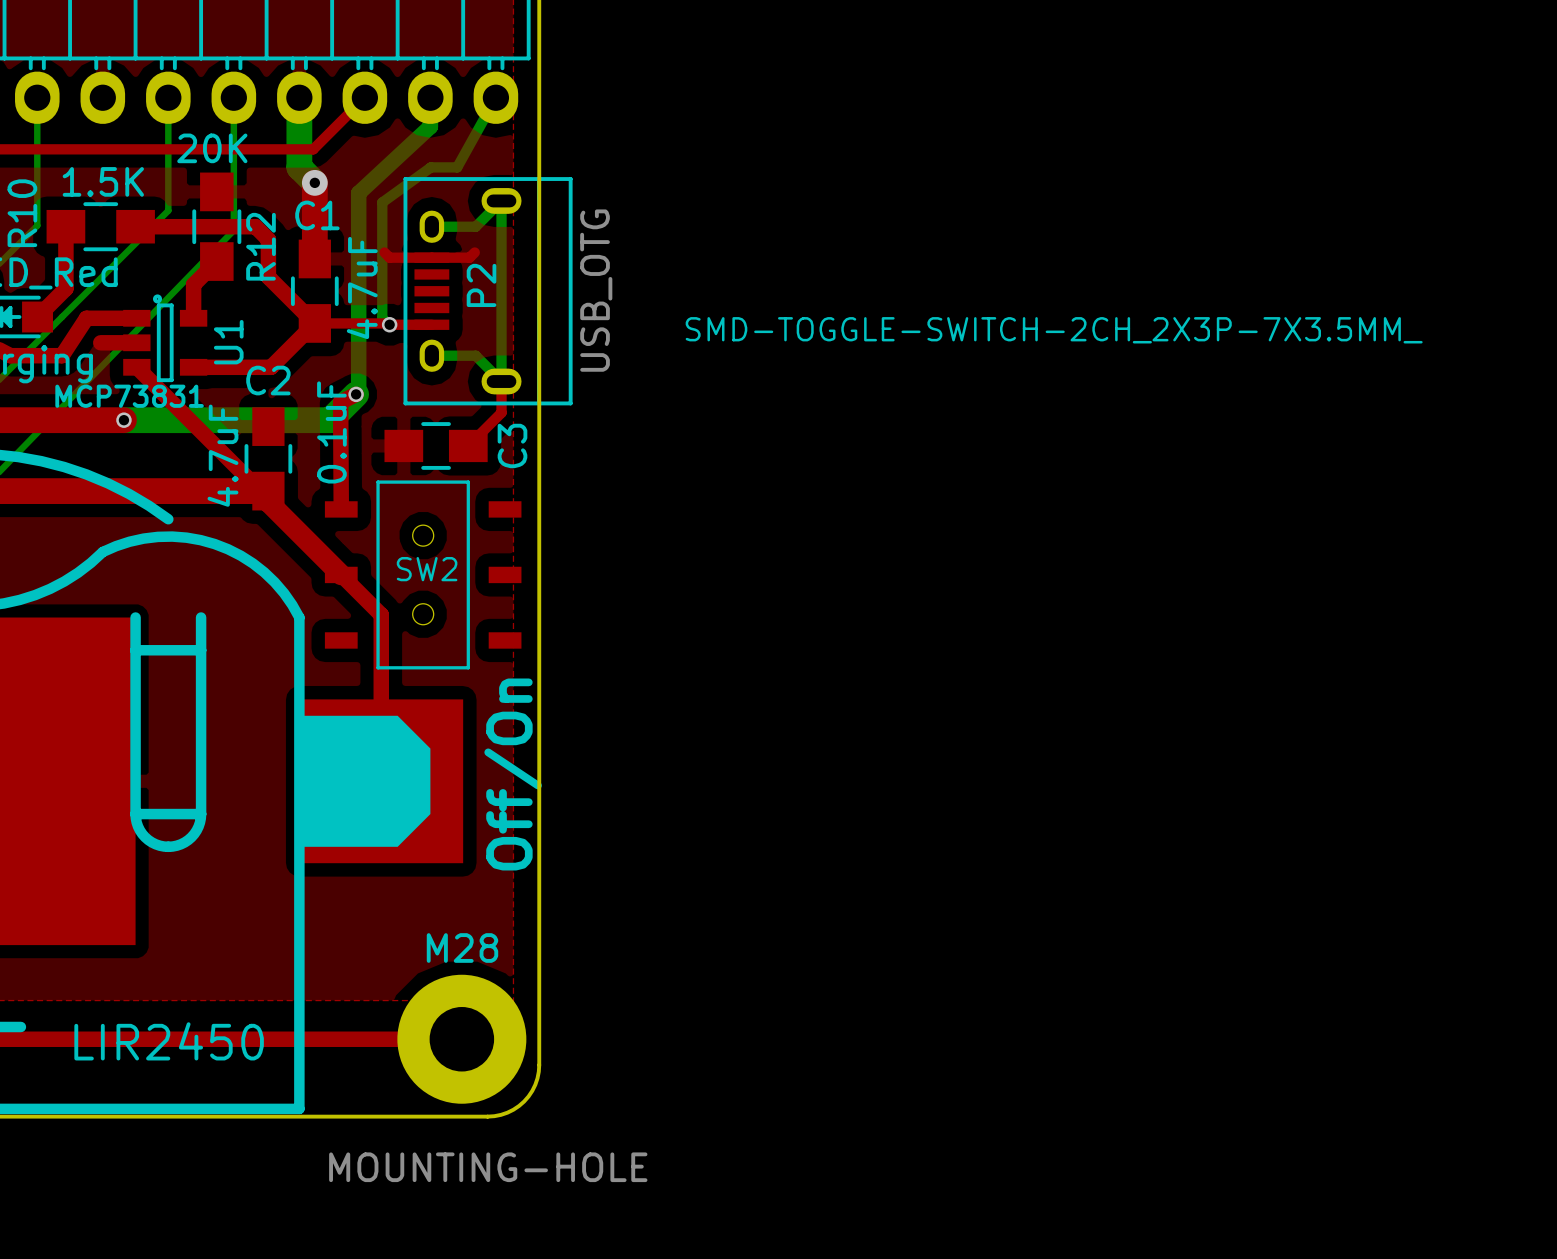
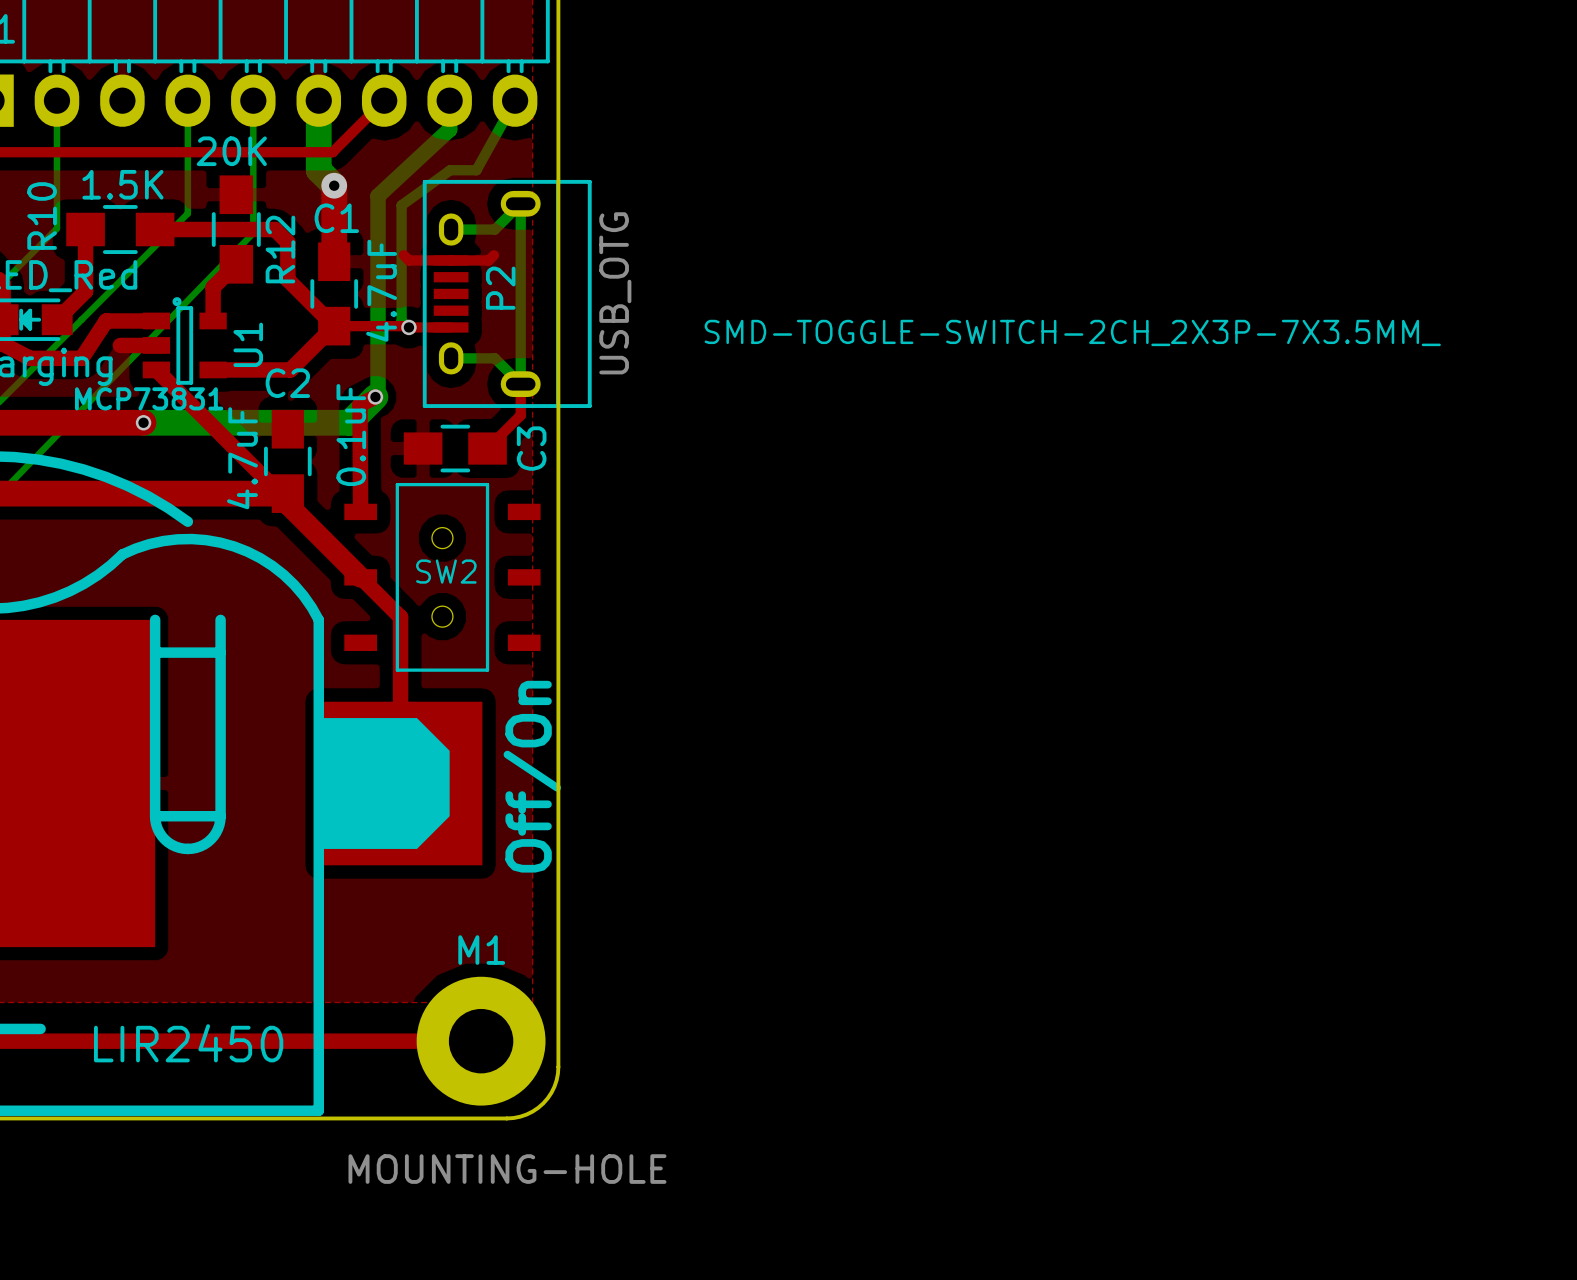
M28 name: M28 (462, 948) -> M1 (481, 950)

